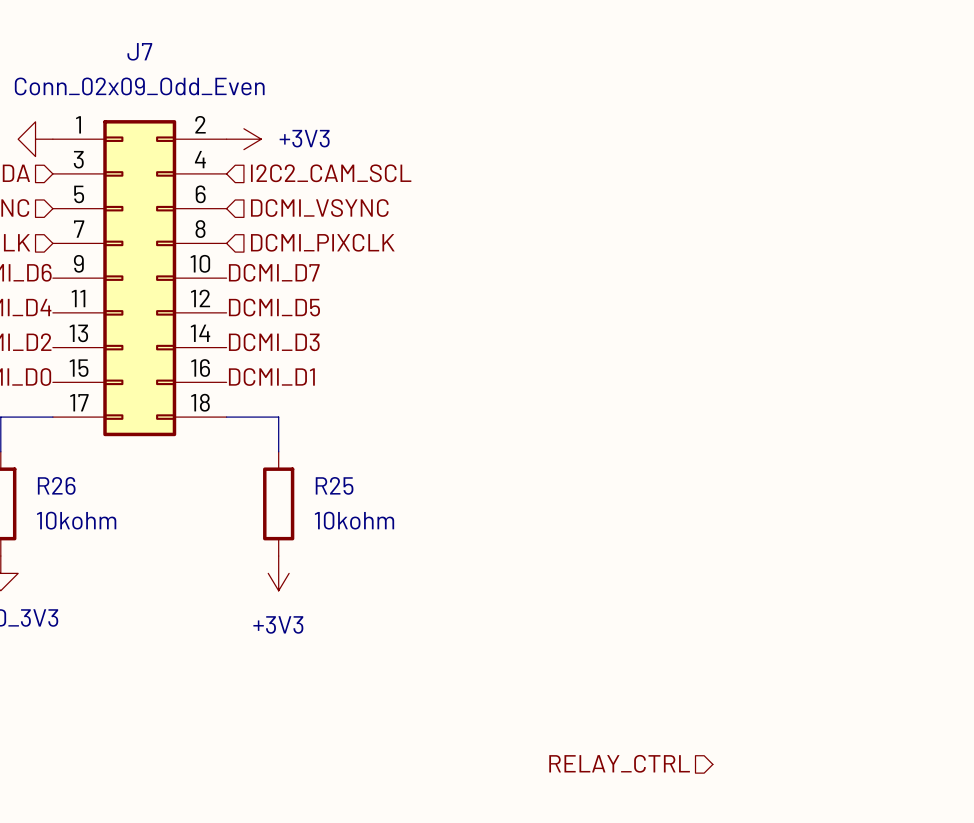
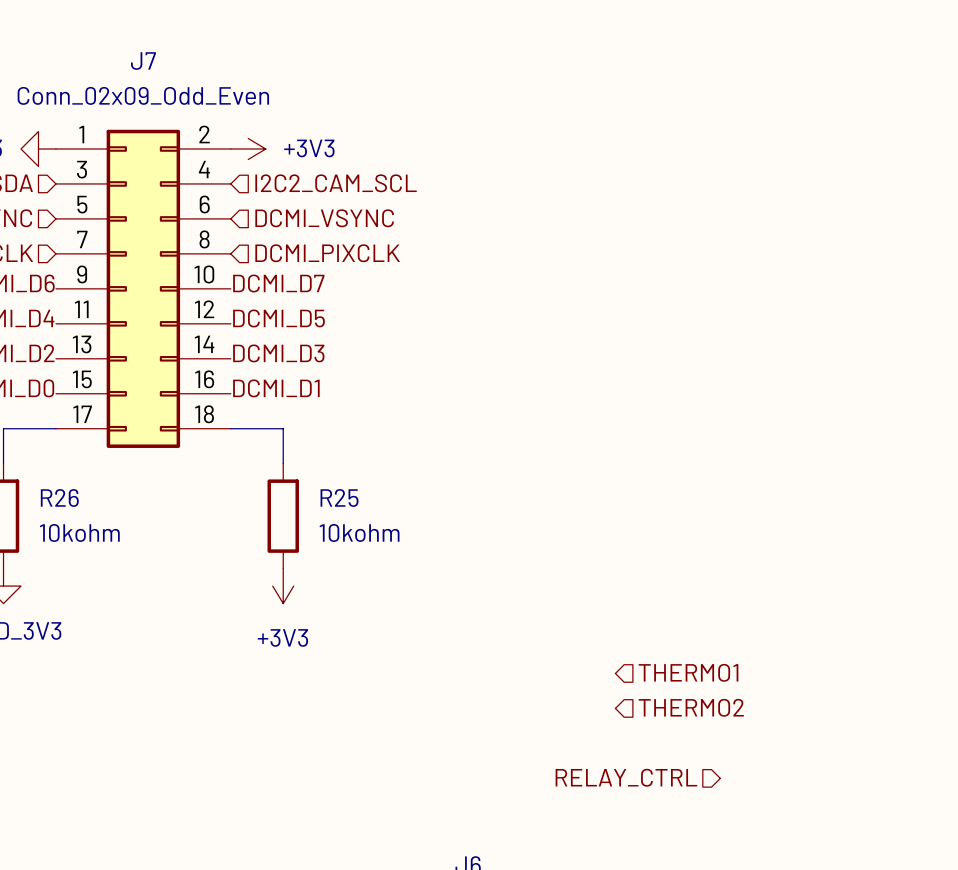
hierarchical label: none -> THERMO1 (688, 672)
hierarchical label: none -> THERMO2 (691, 707)

